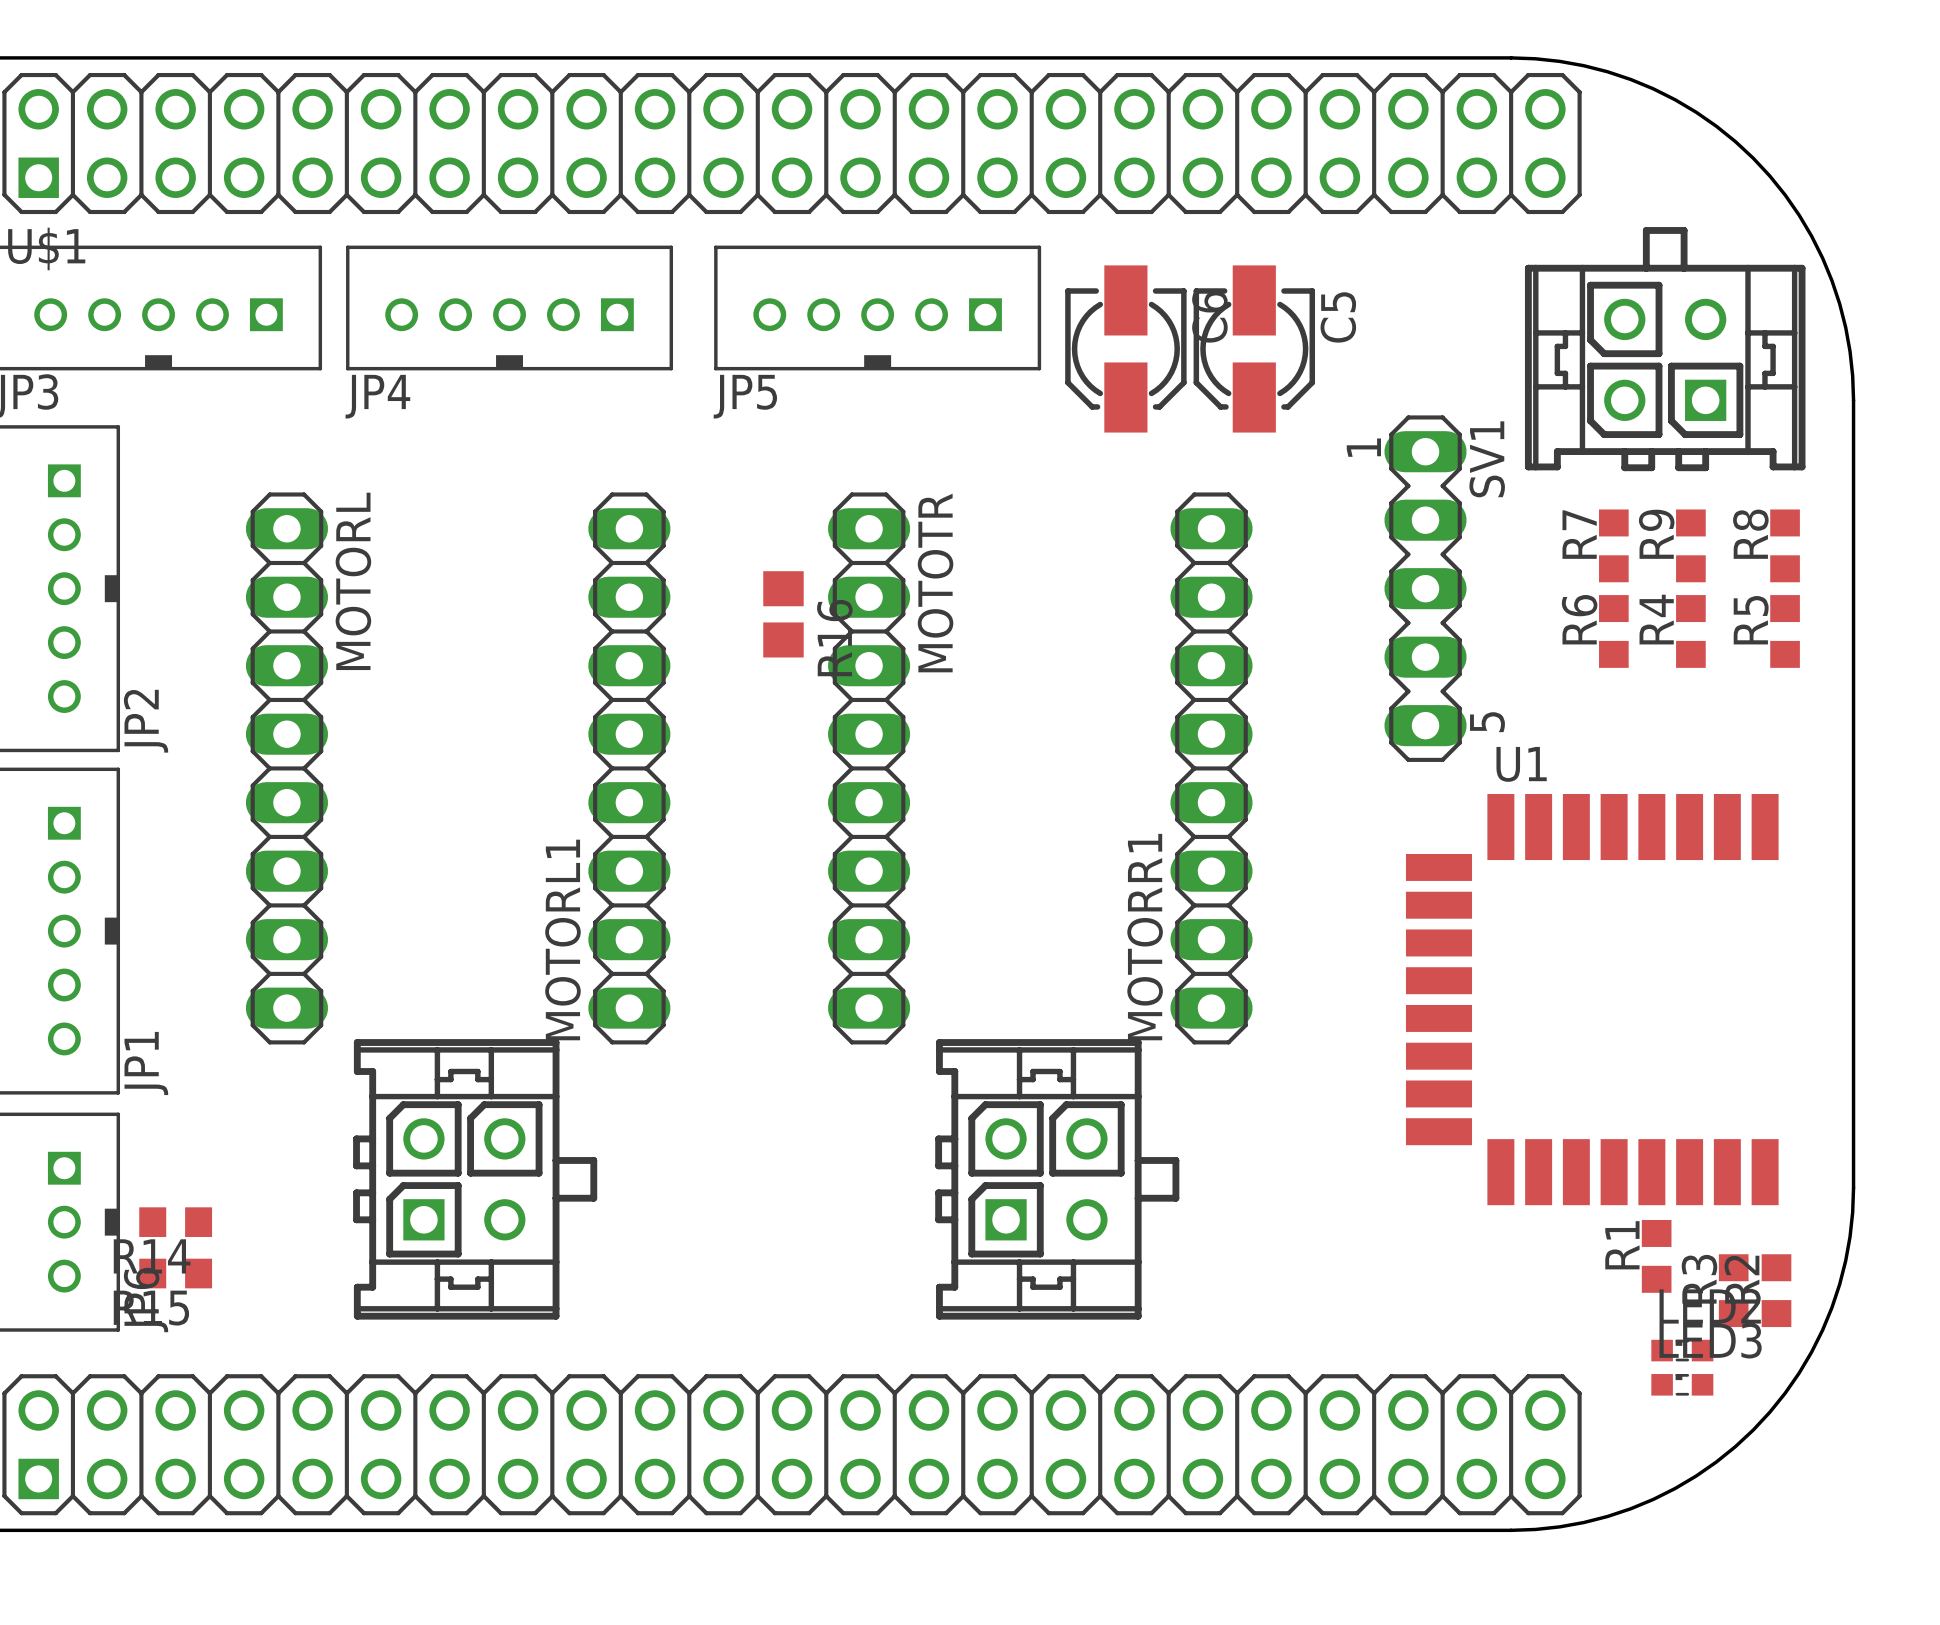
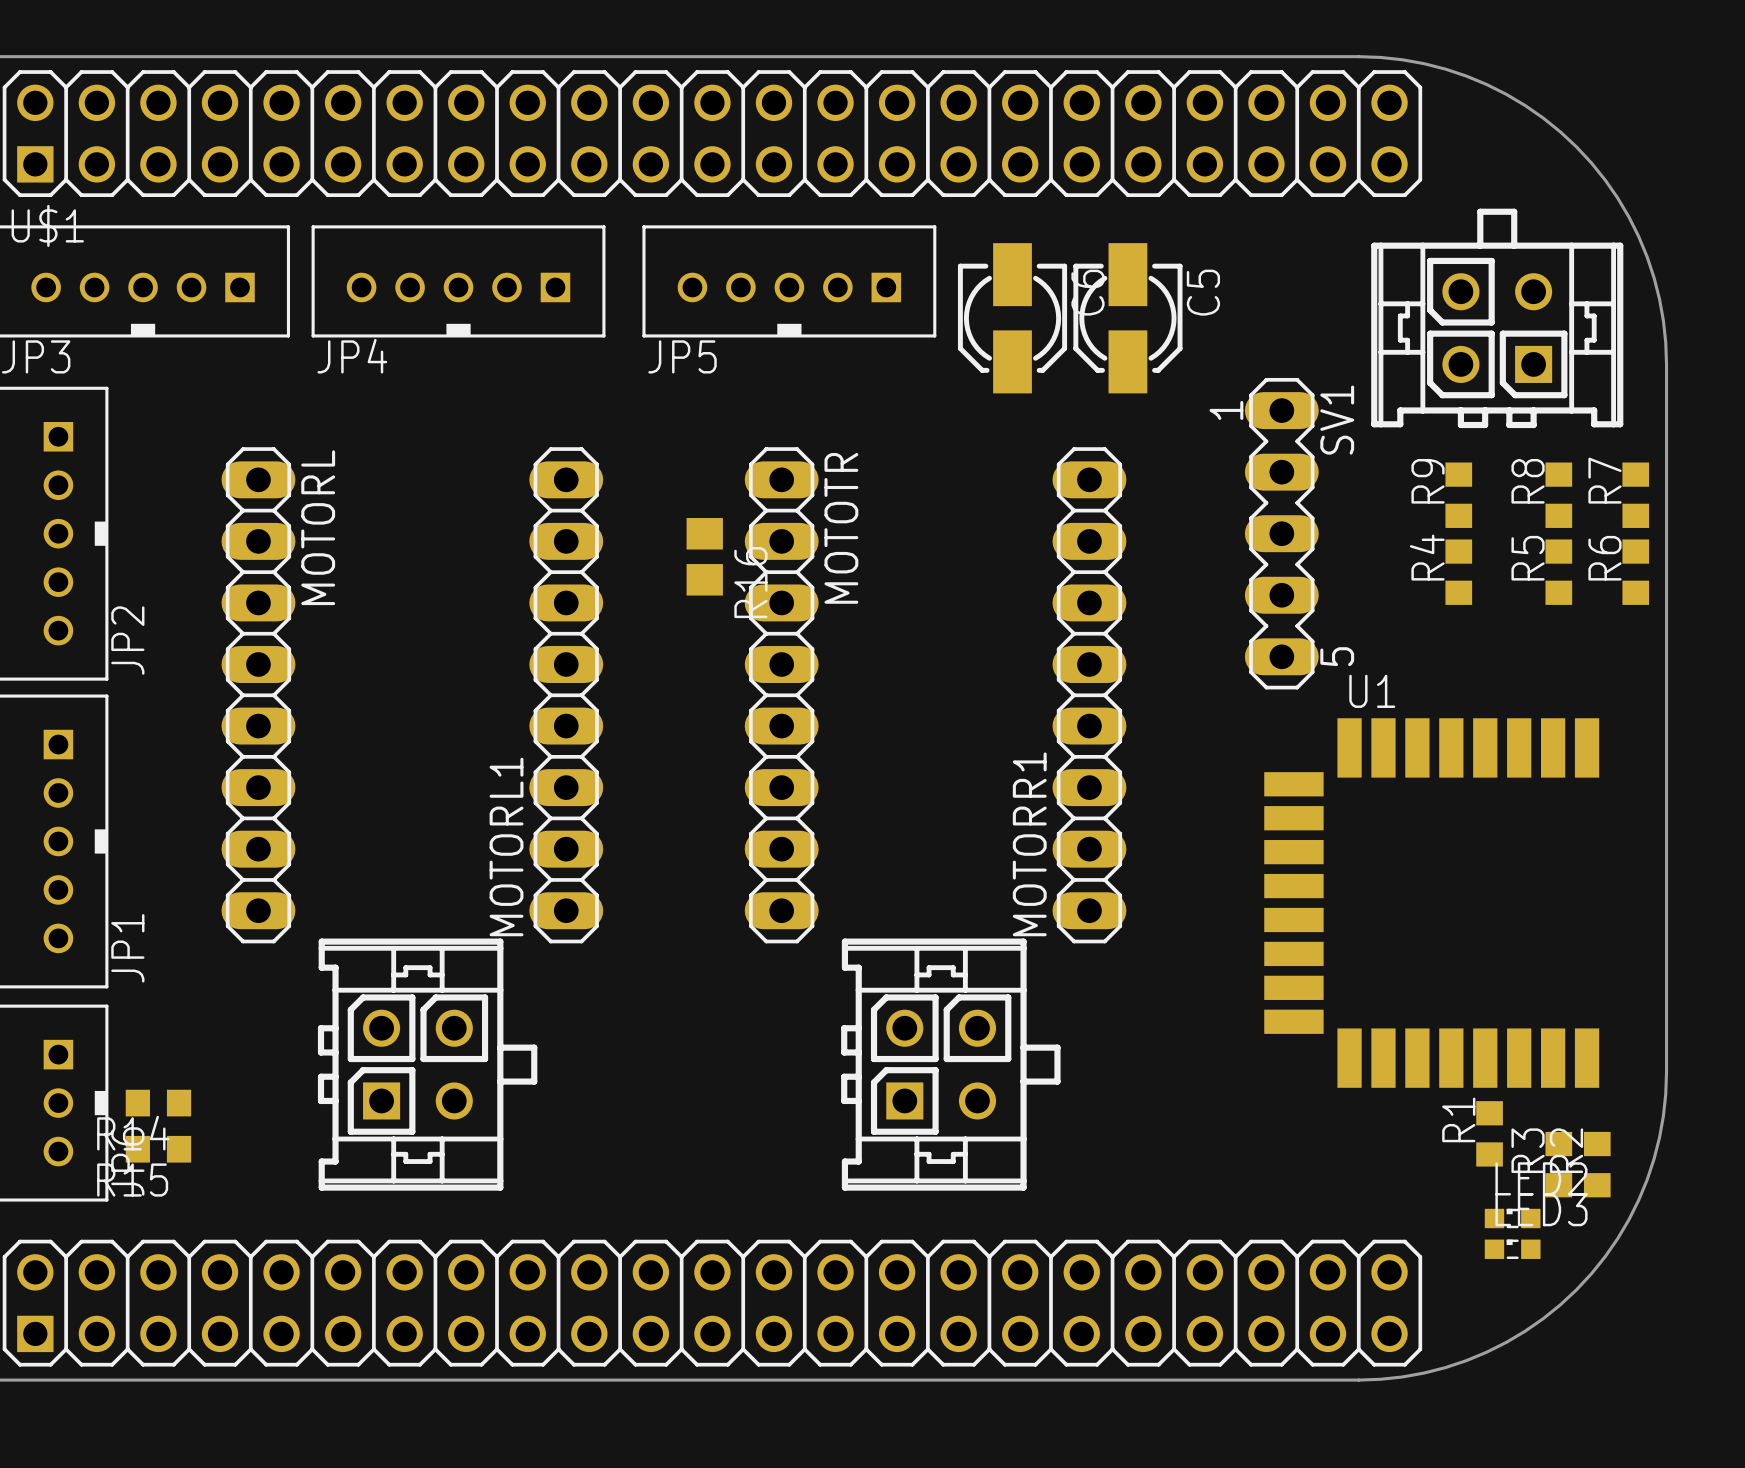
R7 position: (1613, 545) -> (1635, 495)
R9 position: (1690, 545) -> (1458, 495)
R8 position: (1785, 545) -> (1558, 495)
R6 position: (1613, 631) -> (1635, 572)
R4 position: (1690, 631) -> (1458, 572)
R5 position: (1785, 631) -> (1558, 572)

